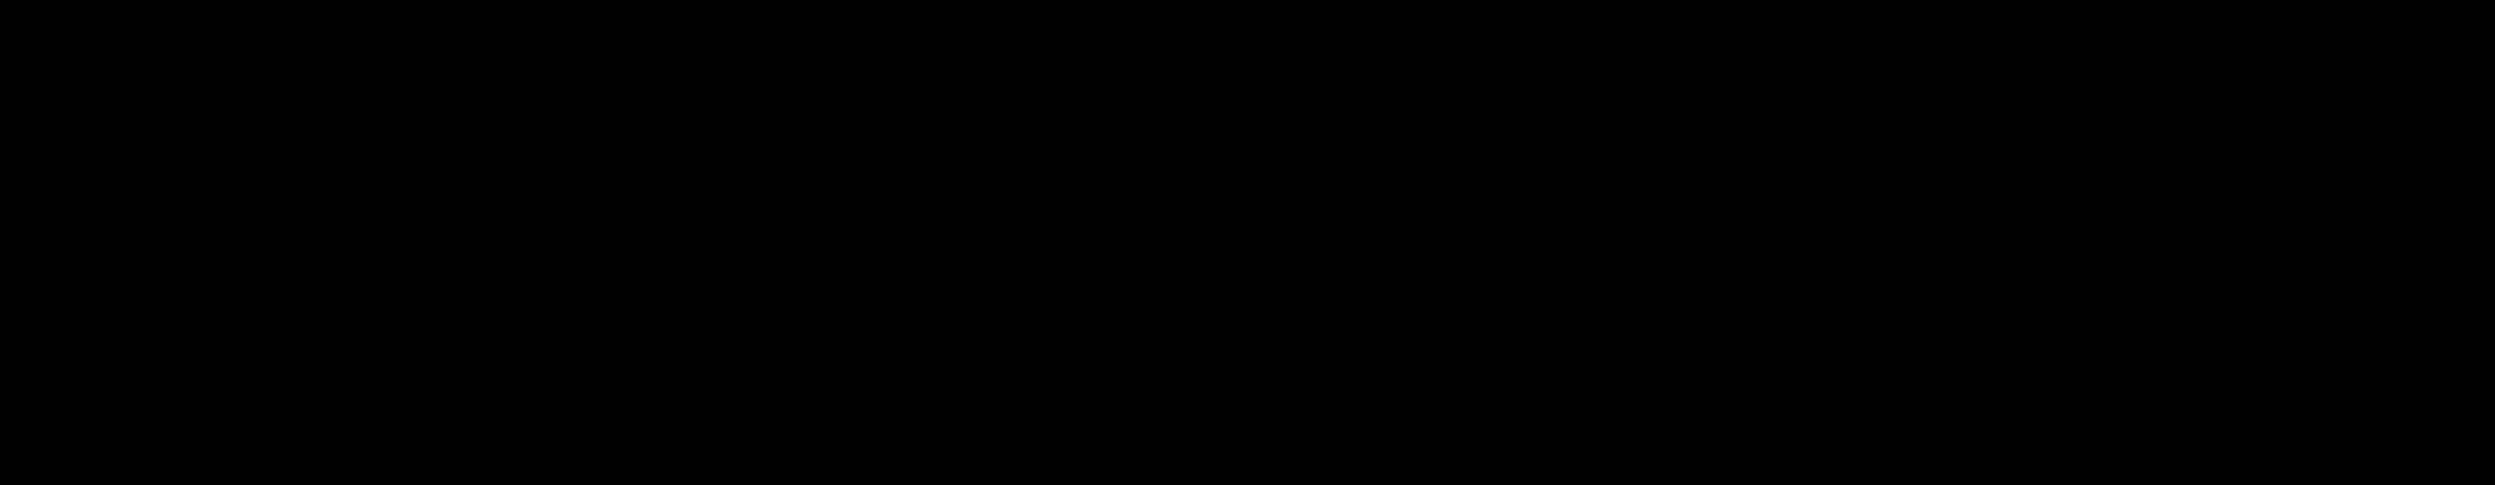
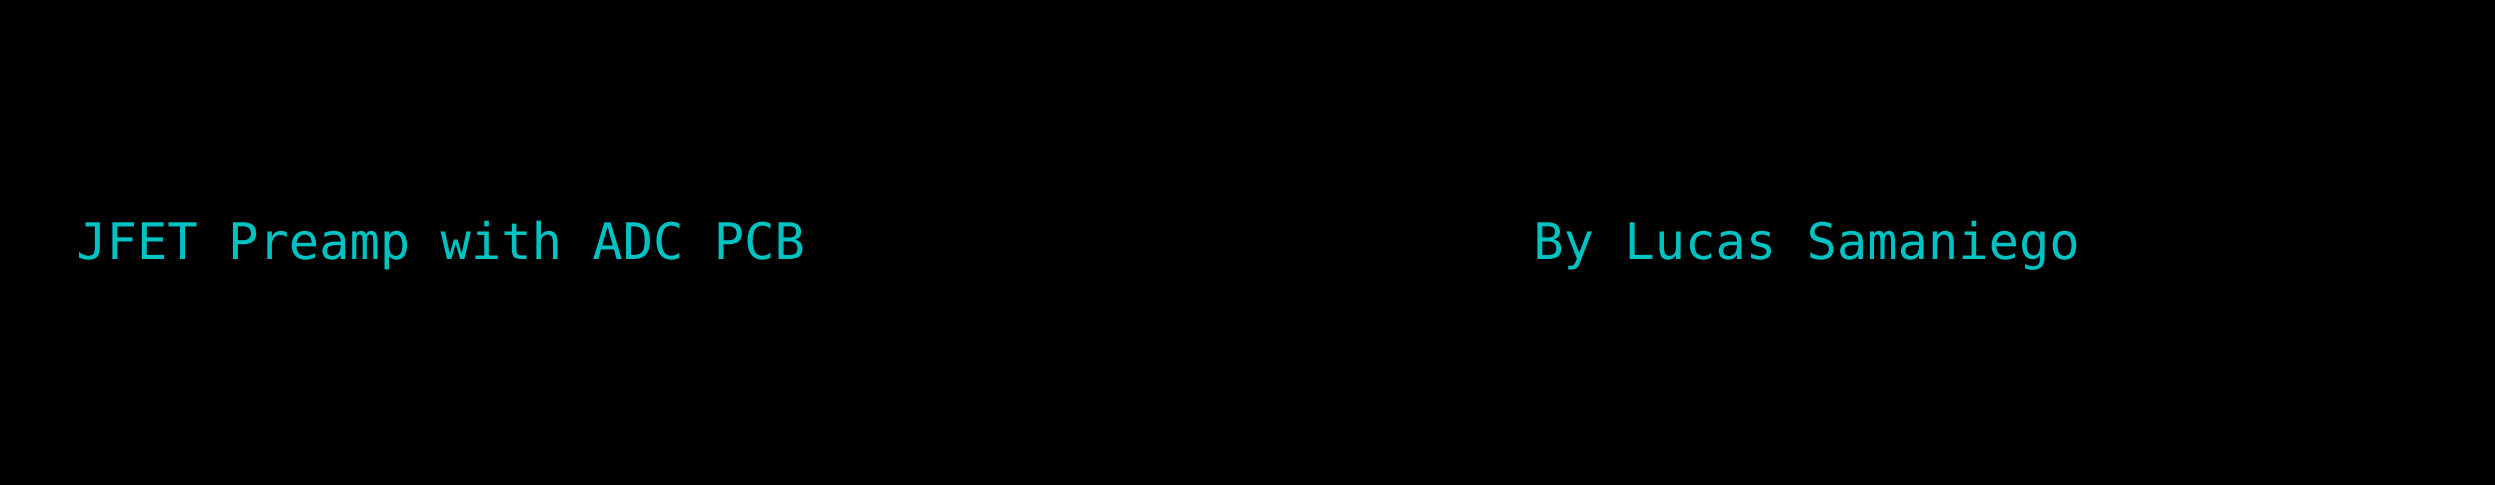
text: none -> JFET Preamp with ADC PCB By Lucas Samaniego (1077, 245)

